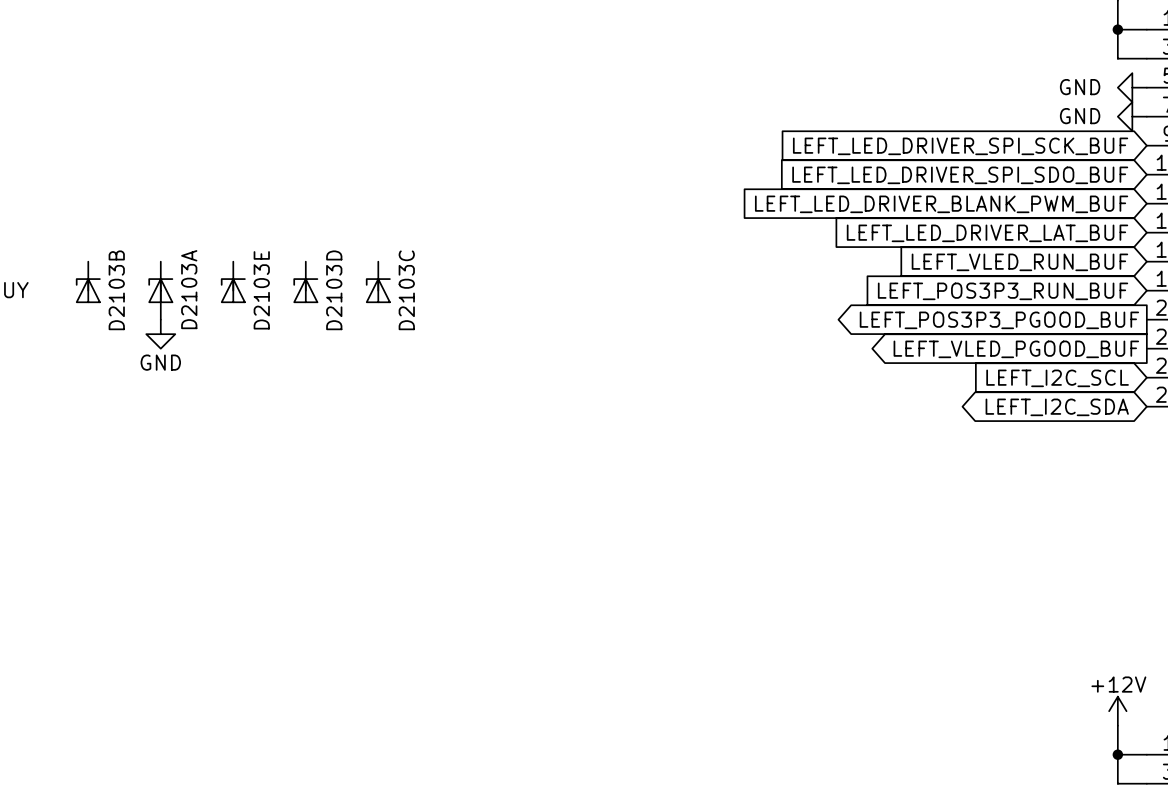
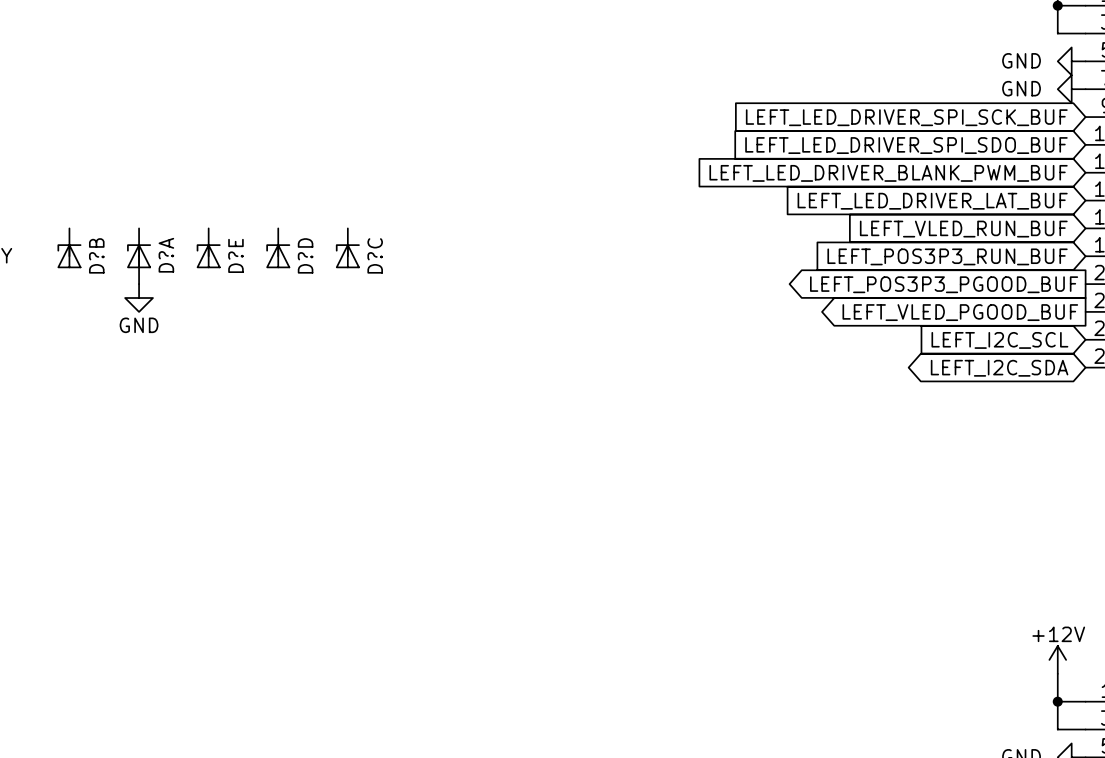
D2103A name: D2103A (189, 289) -> D?A (166, 255)
D2103B name: D2103B (116, 290) -> D?B (96, 255)
D2103E name: D2103E (261, 290) -> D?E (235, 255)
D2103D name: D2103D (334, 290) -> D?D (305, 255)
D2103C name: D2103C (406, 290) -> D?C (375, 255)

